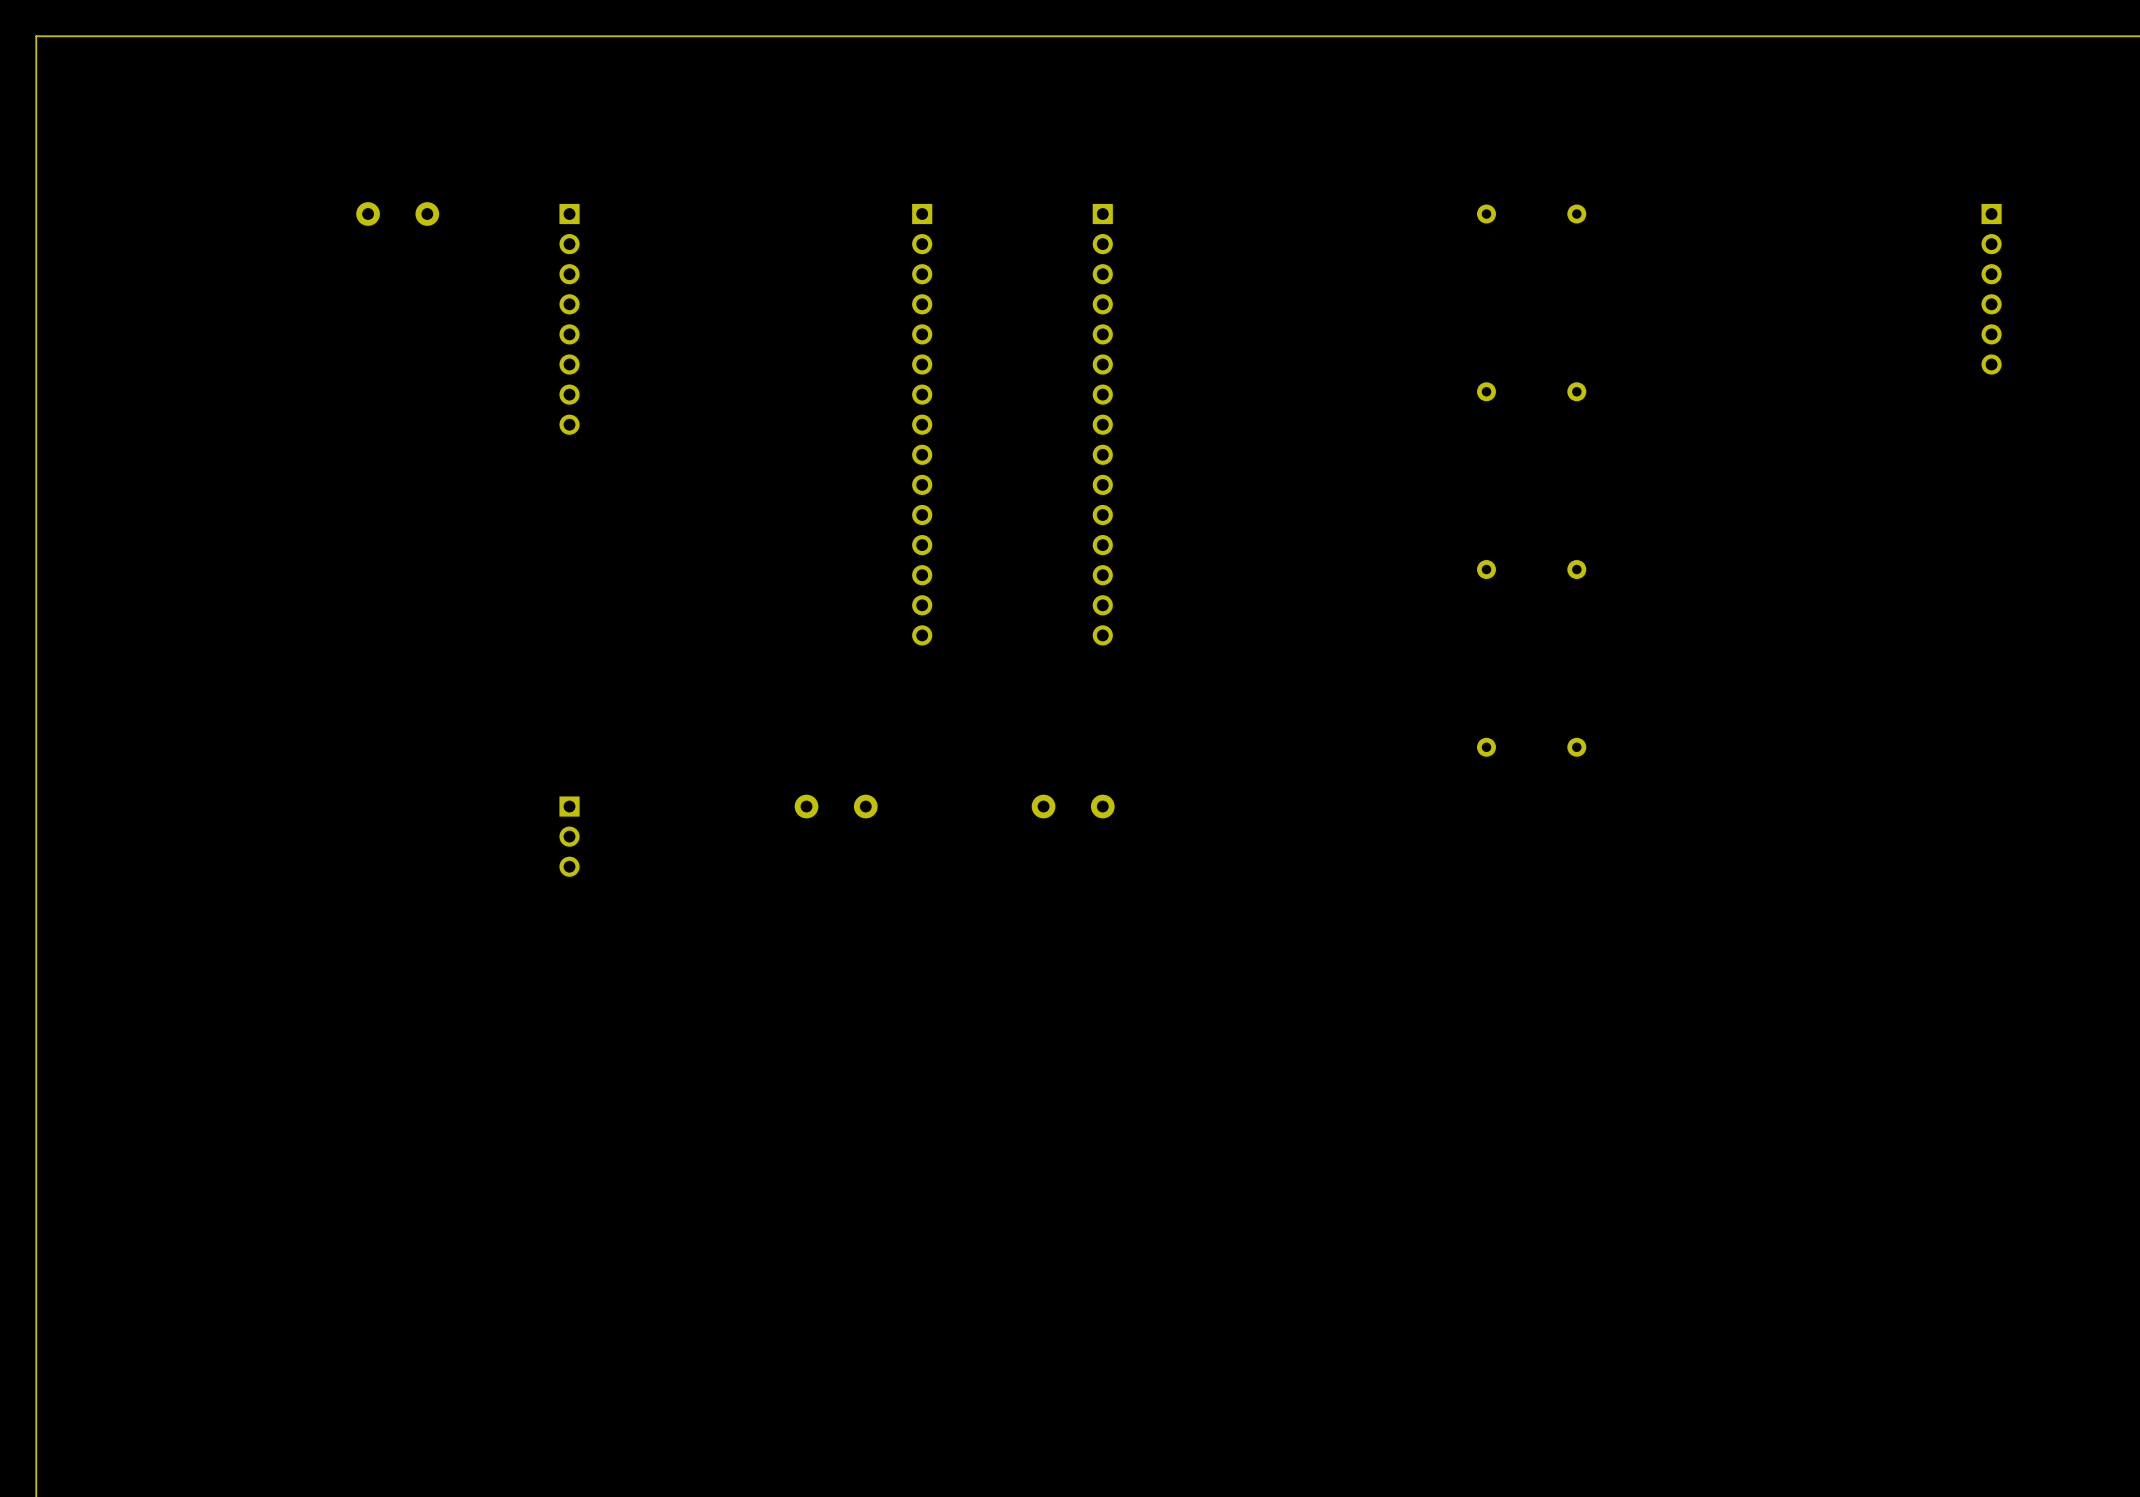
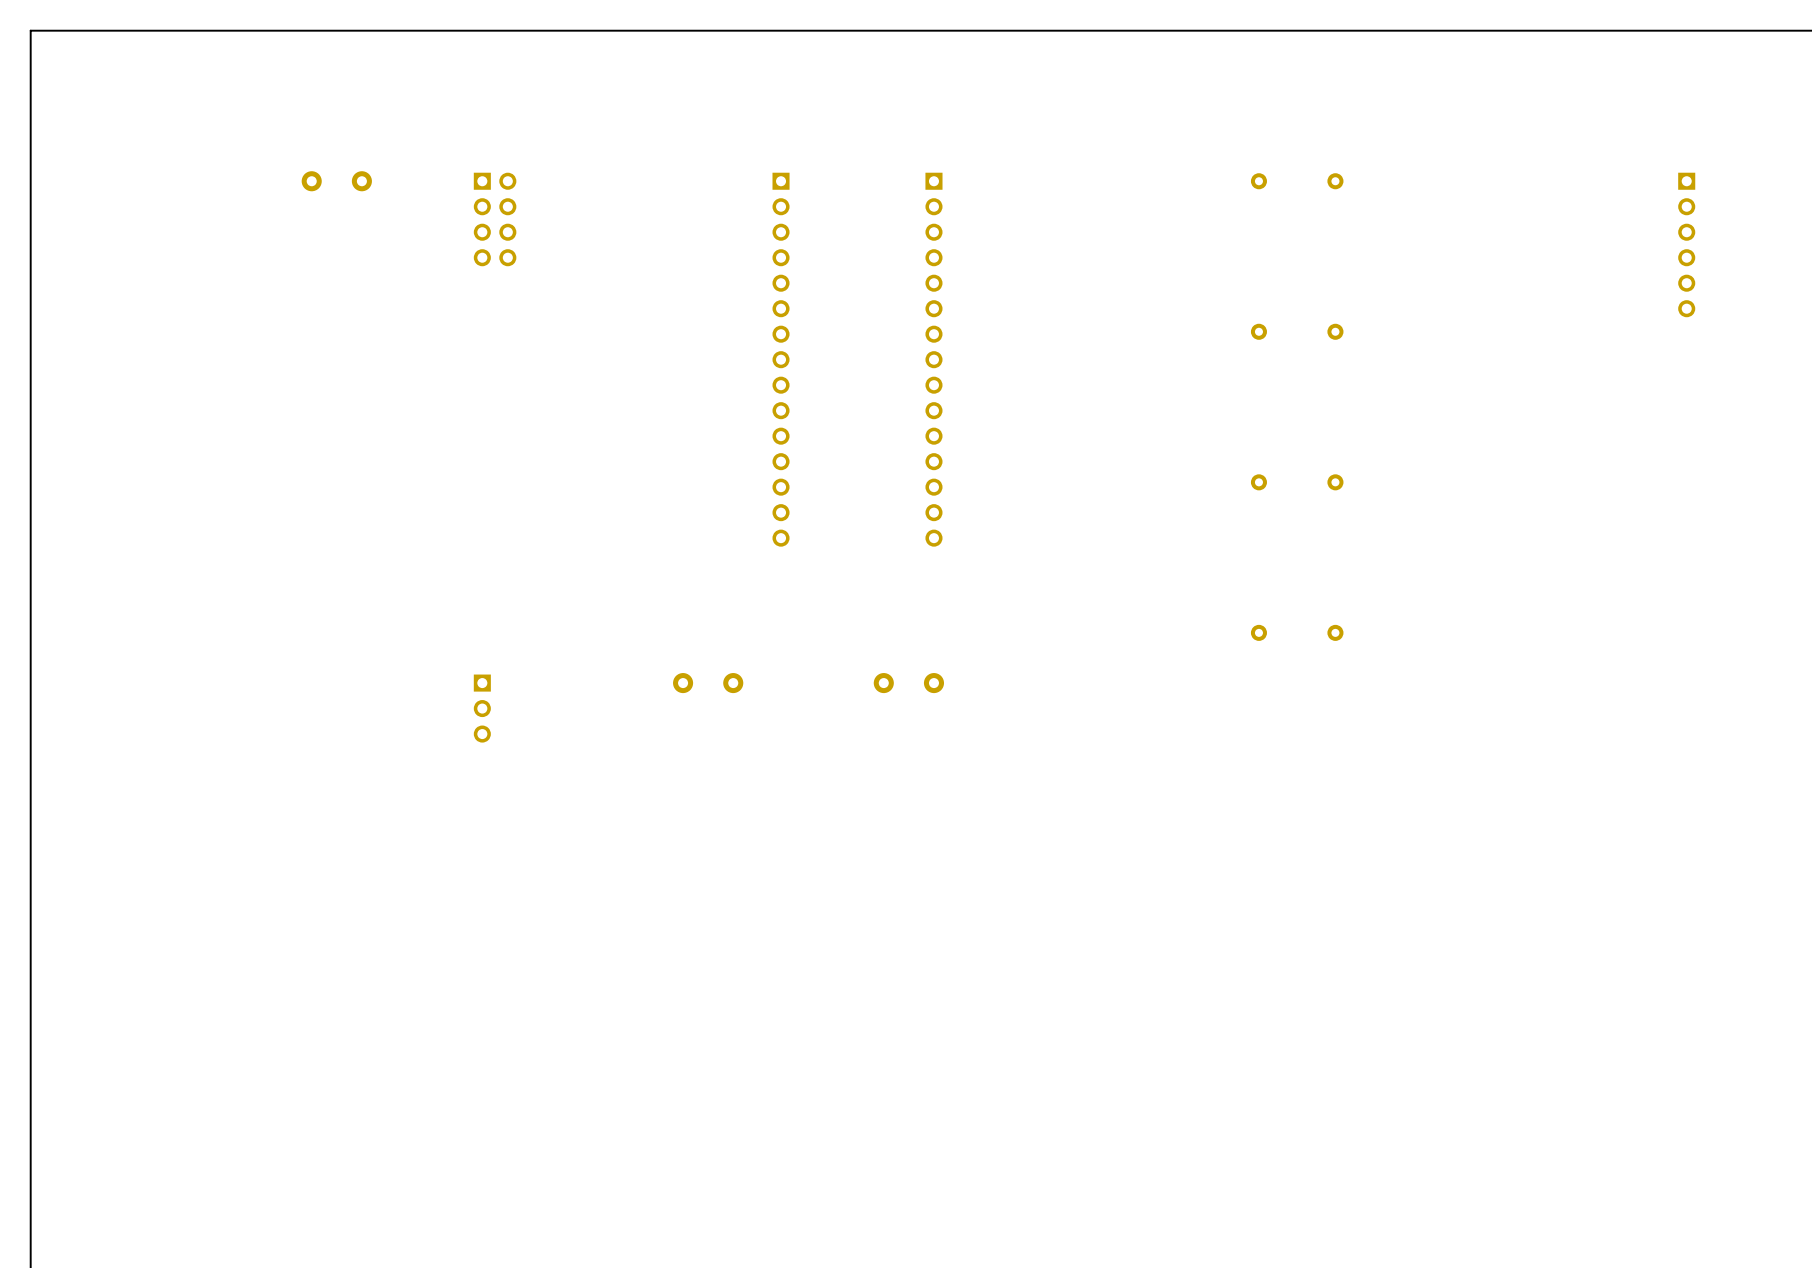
part: none -> (495, 219)
part: (569, 319) -> none

